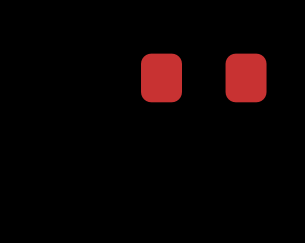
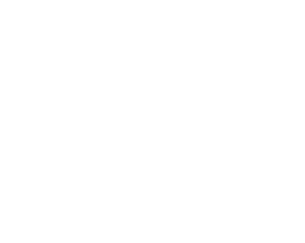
part: (203, 77) -> none

